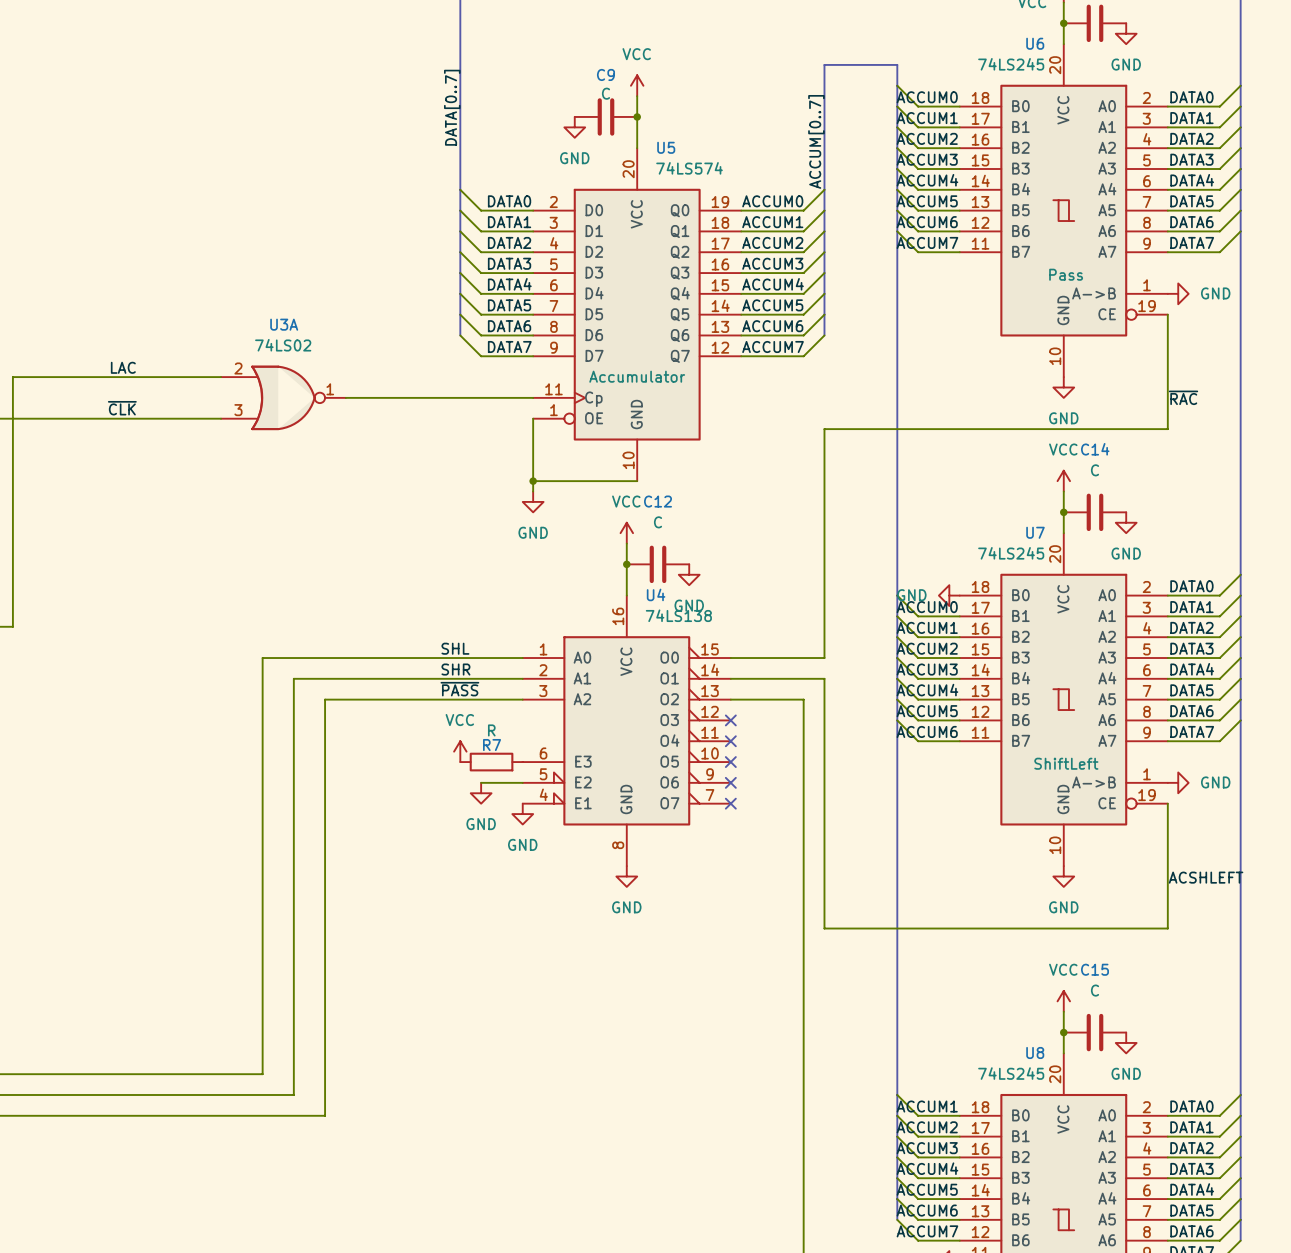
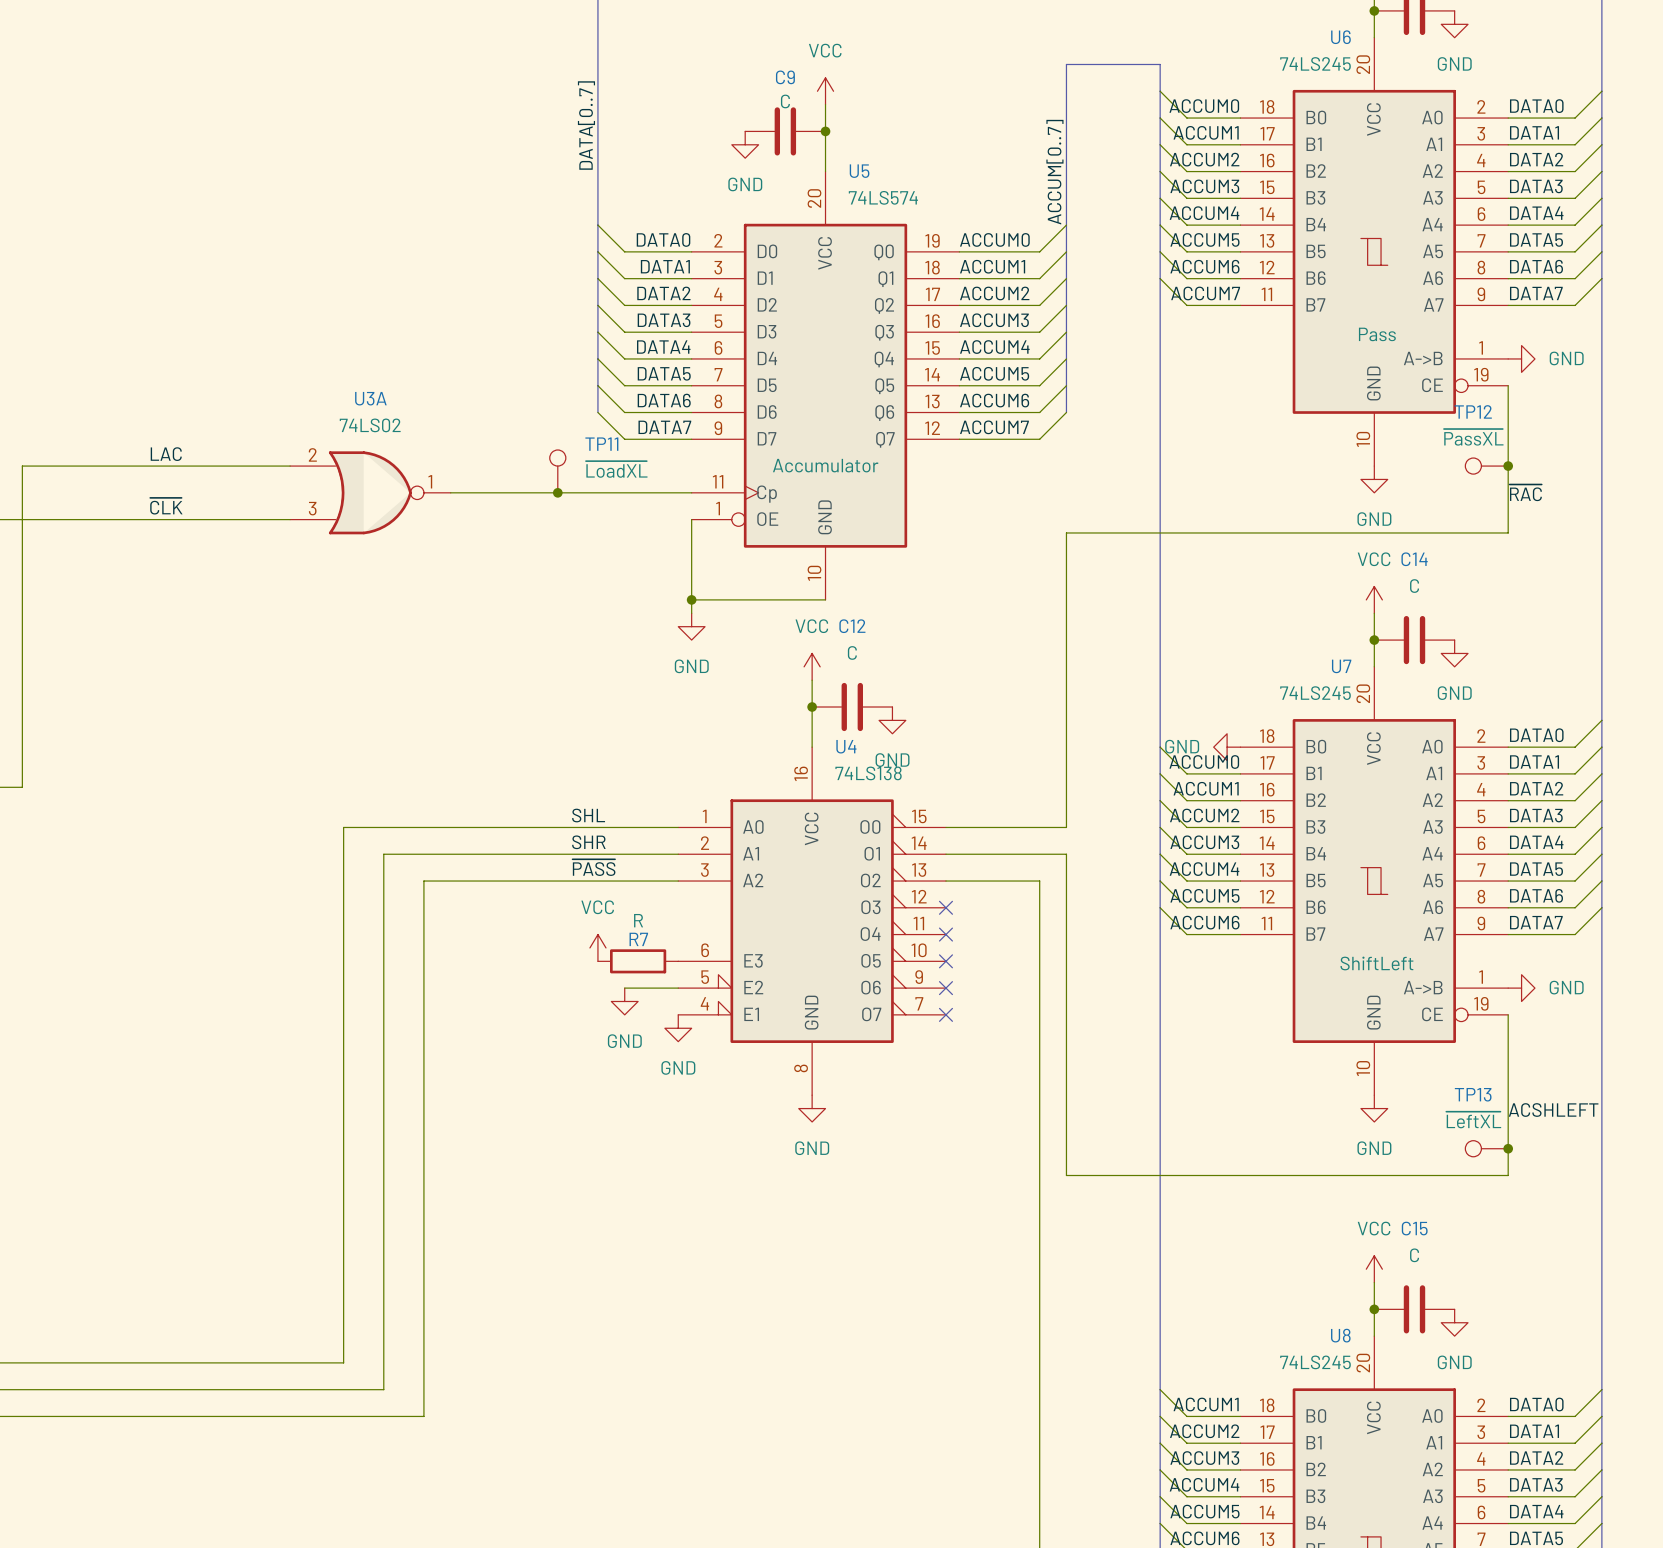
TP12: none -> ~{PassXL} (1486, 466)
junction: none -> (1508, 466)
TP11: none -> ~{LoadXL} (557, 471)
junction: none -> (557, 492)
TP13: none -> ~{LeftXL} (1486, 1148)
junction: none -> (1508, 1148)

